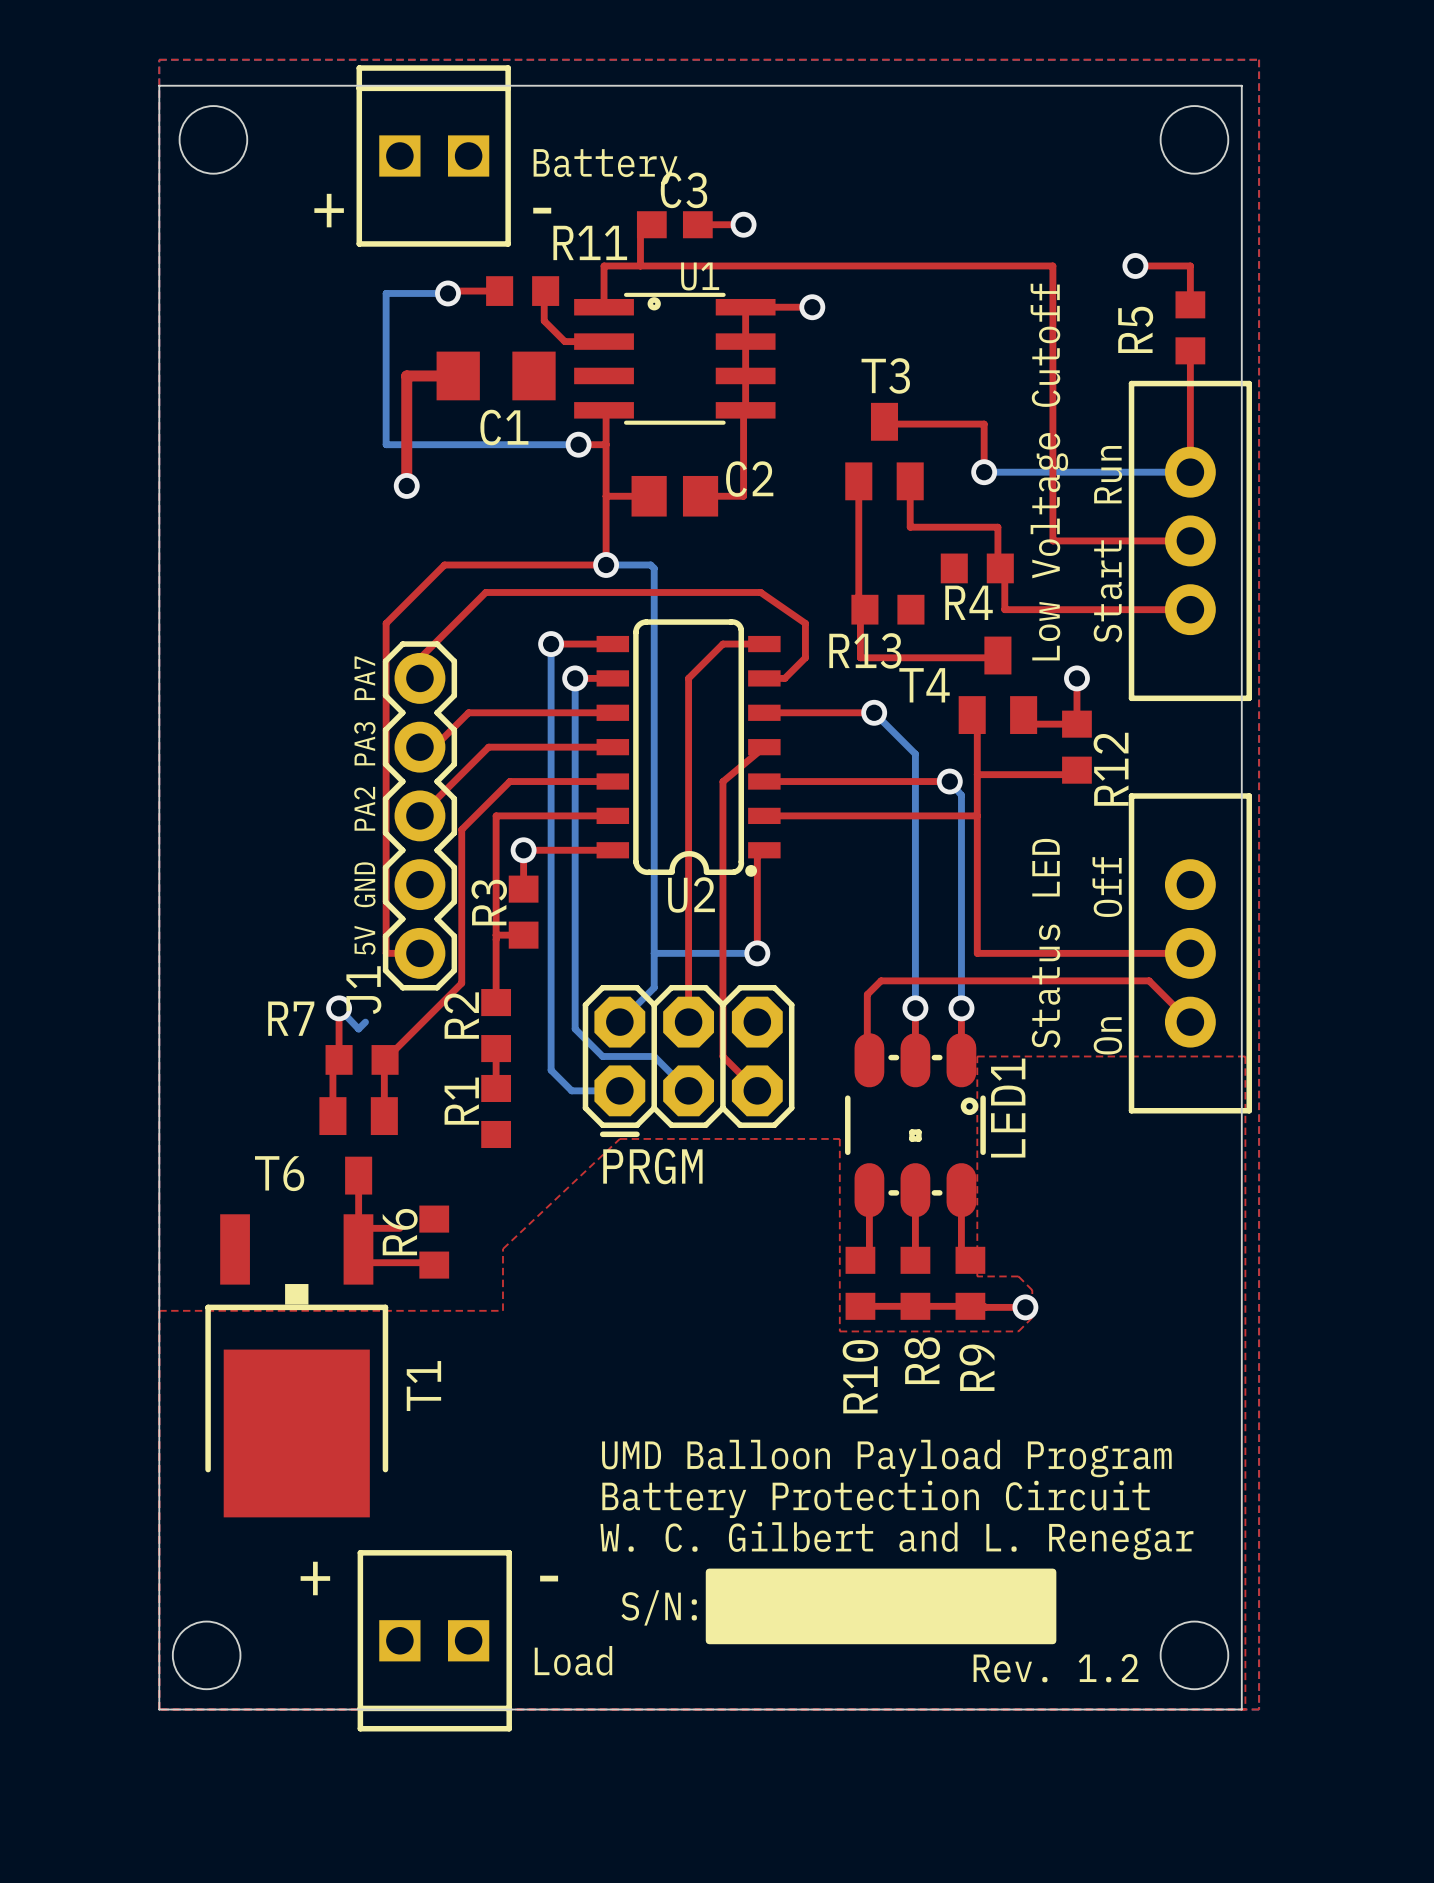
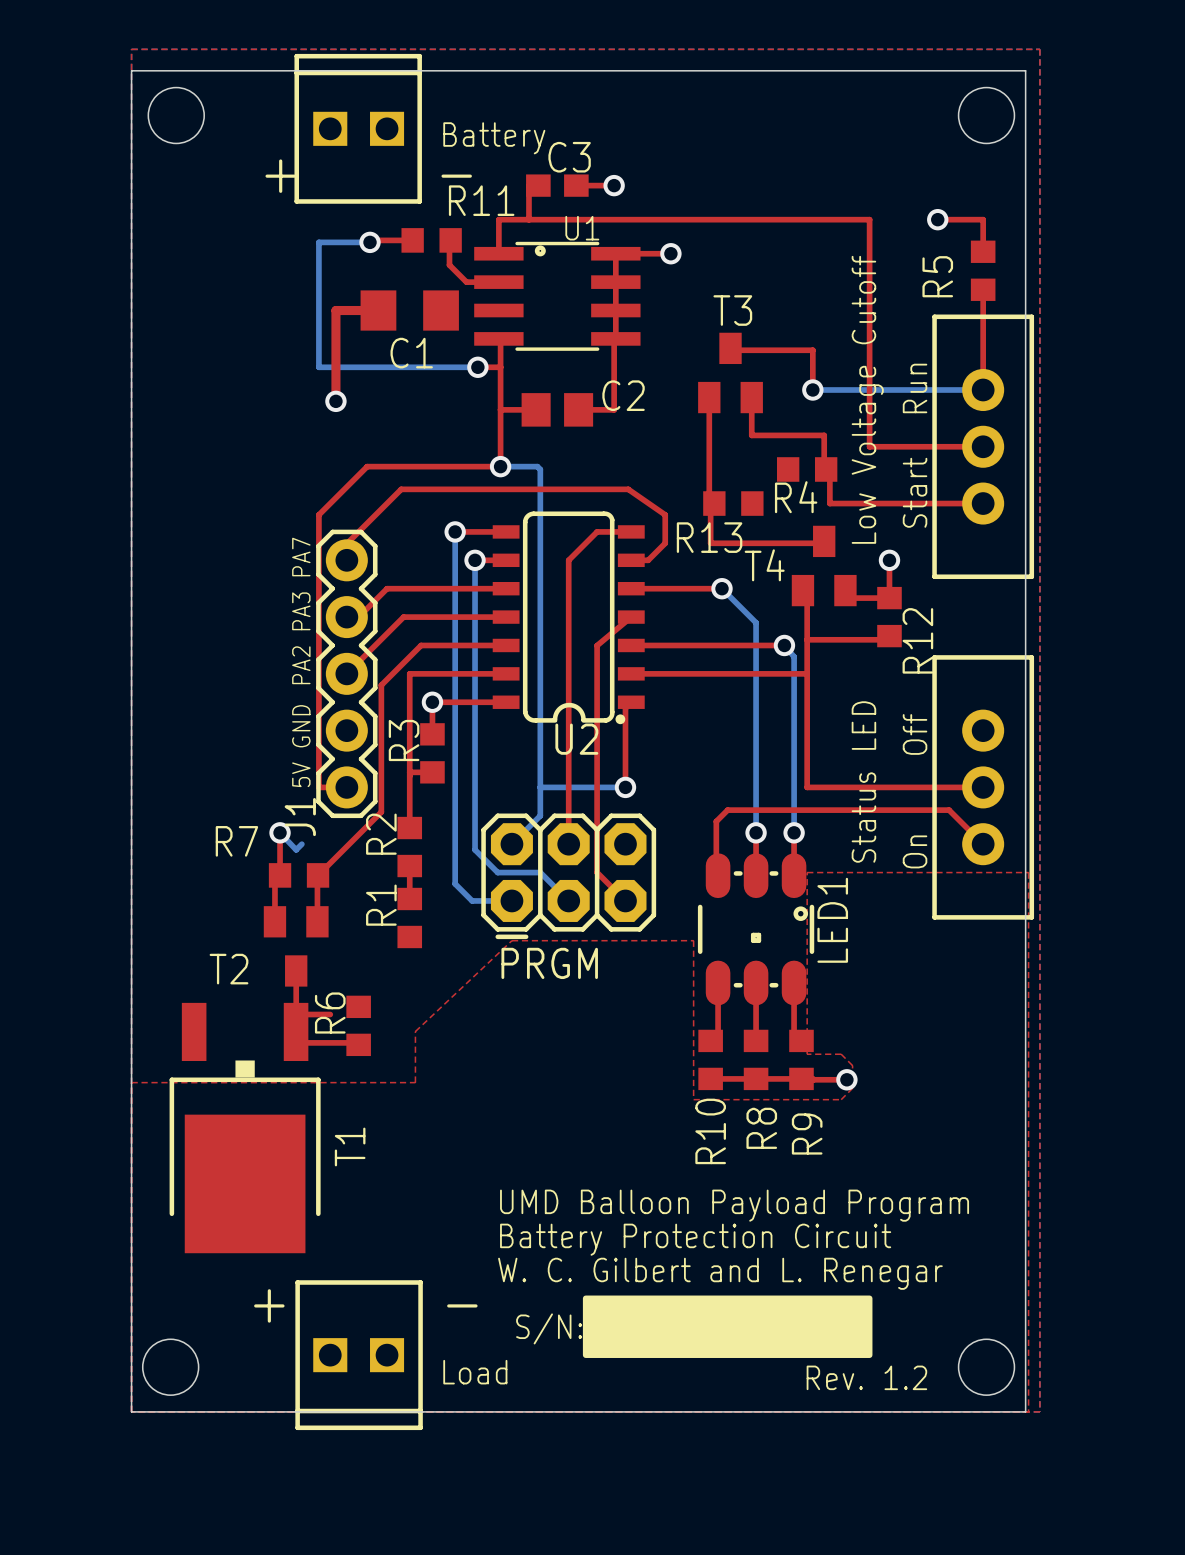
T6 name: T6 (279, 1173) -> T2 (229, 969)

